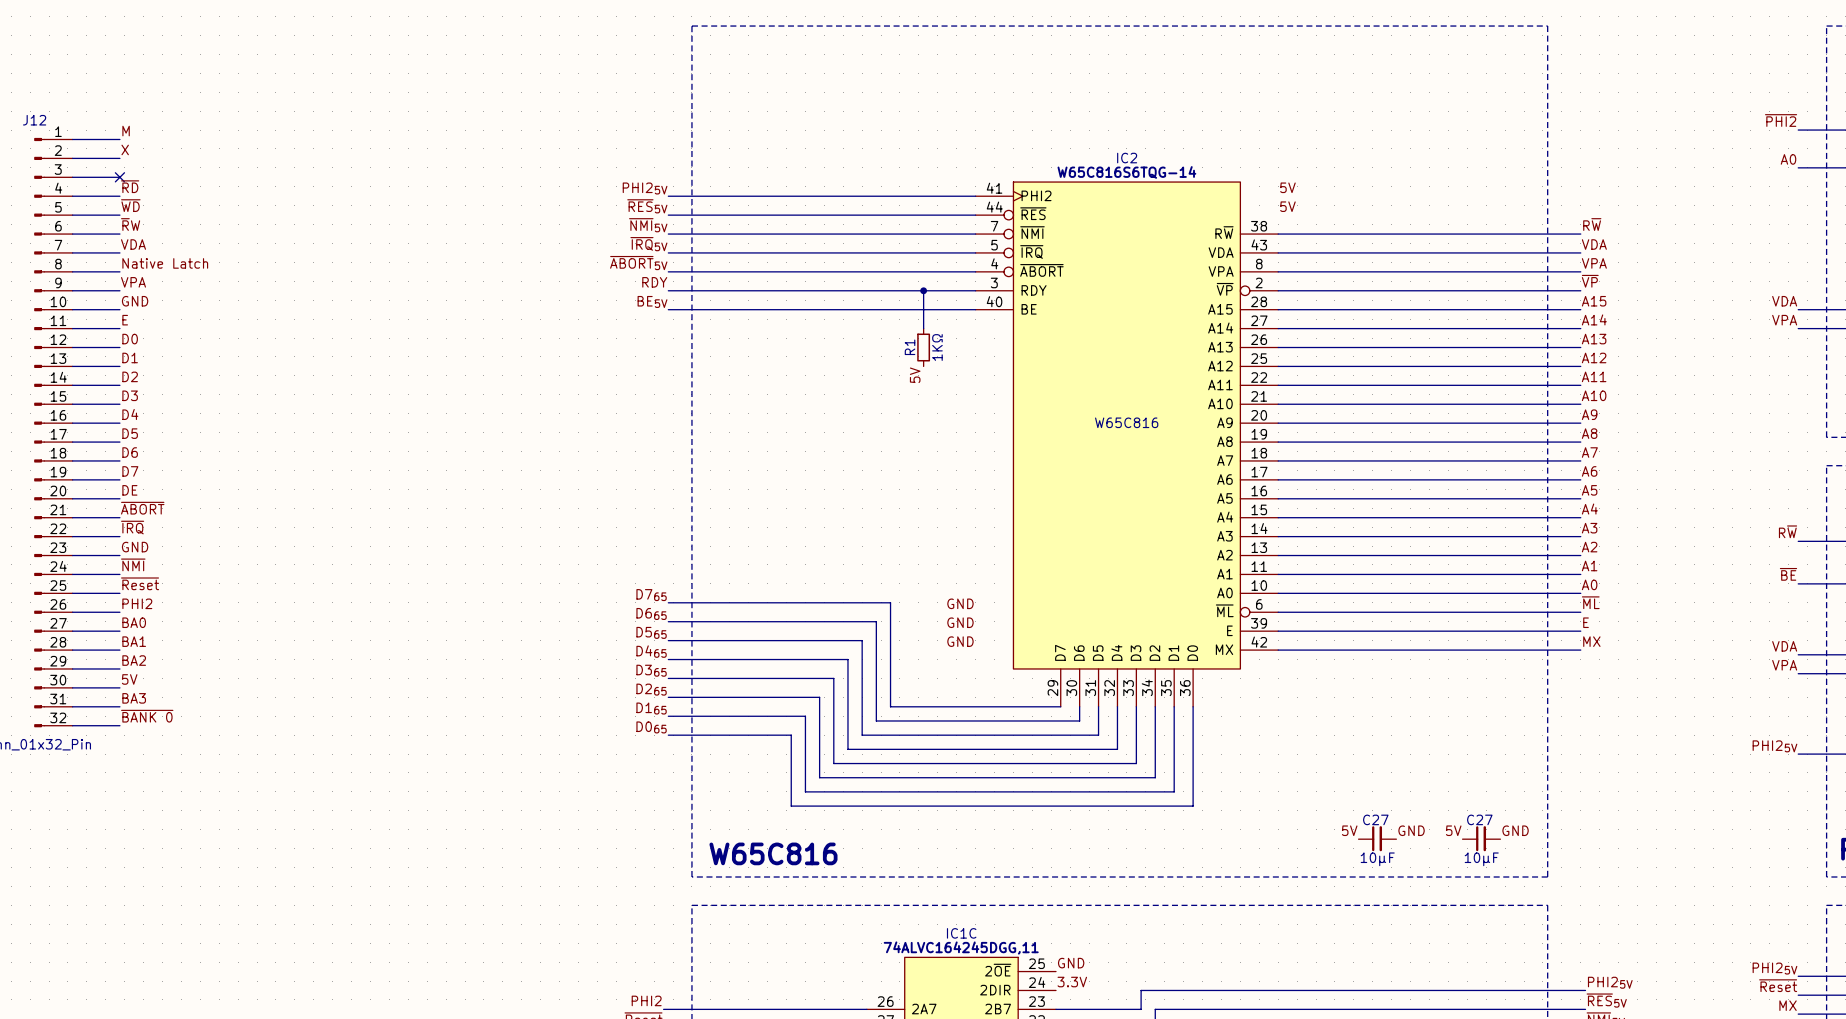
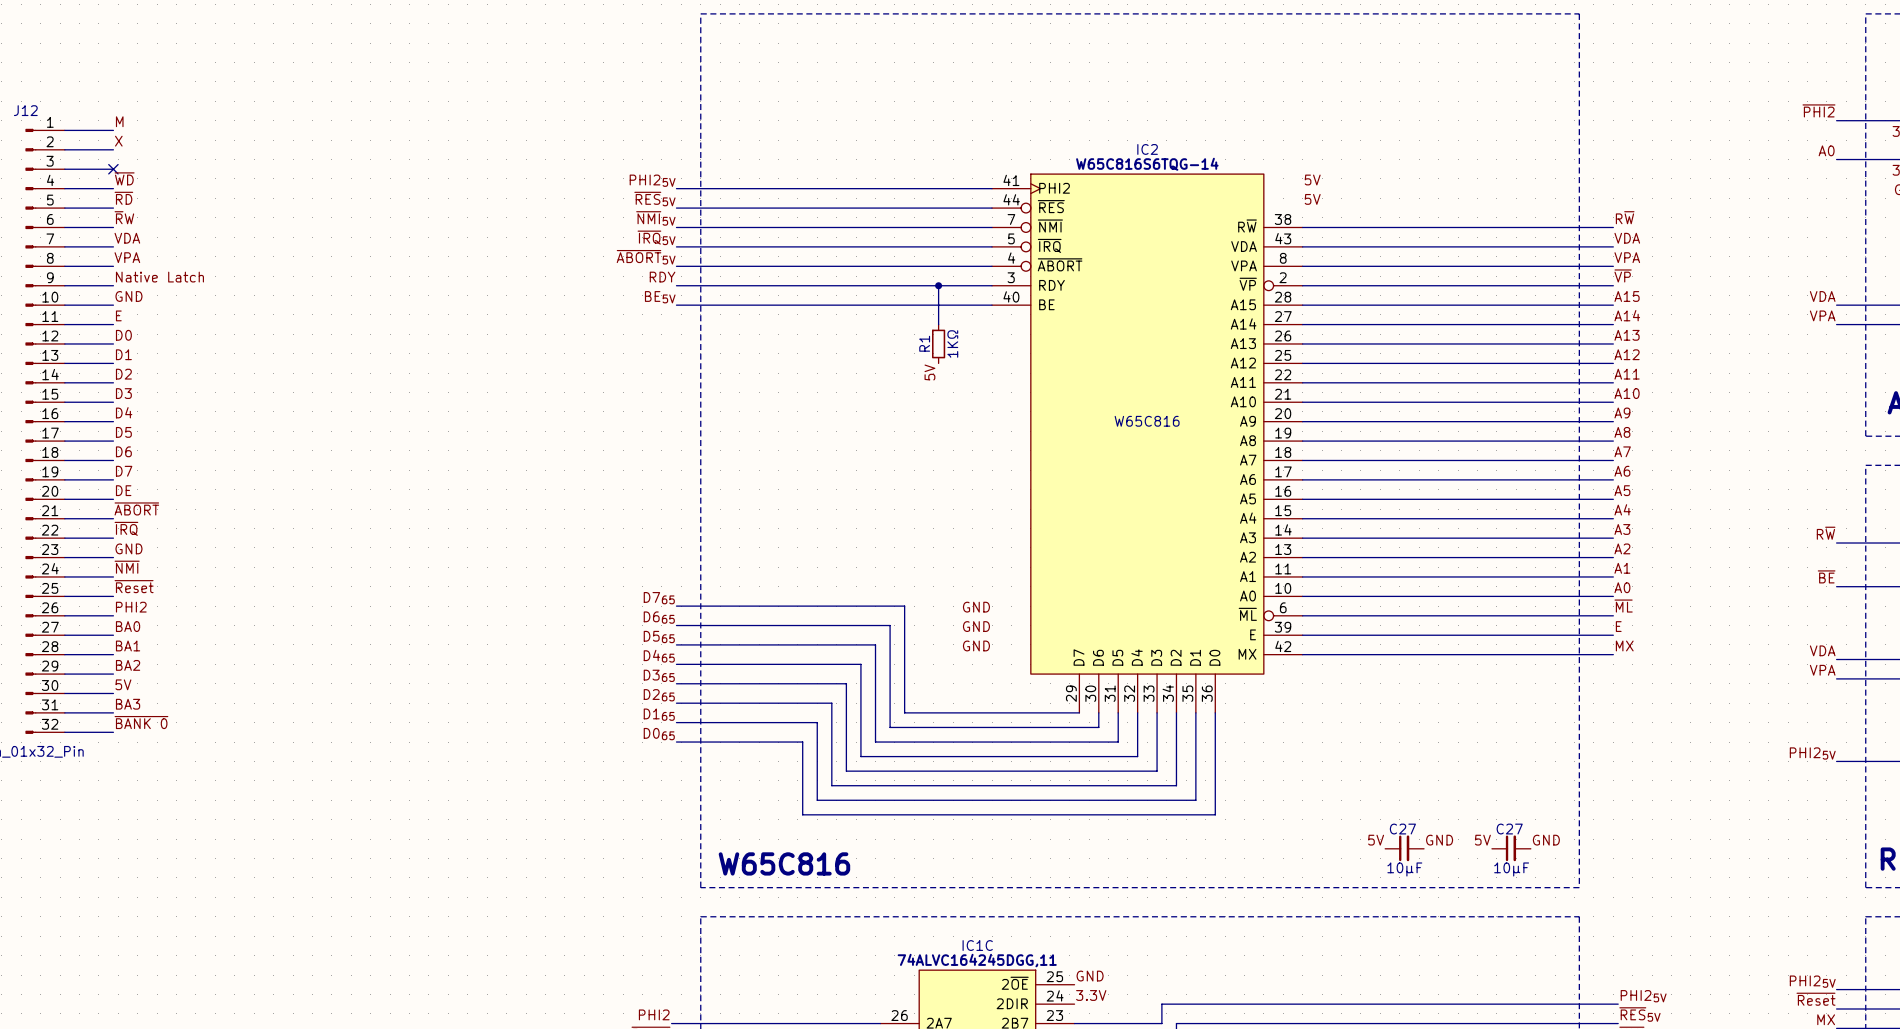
label: ~{RD} (130, 186) -> ~{WD} (124, 178)
label: ~{WD} (130, 205) -> ~{RD} (123, 198)
label: Native Latch (165, 263) -> VPA (127, 257)
label: VPA (133, 282) -> Native Latch (159, 277)

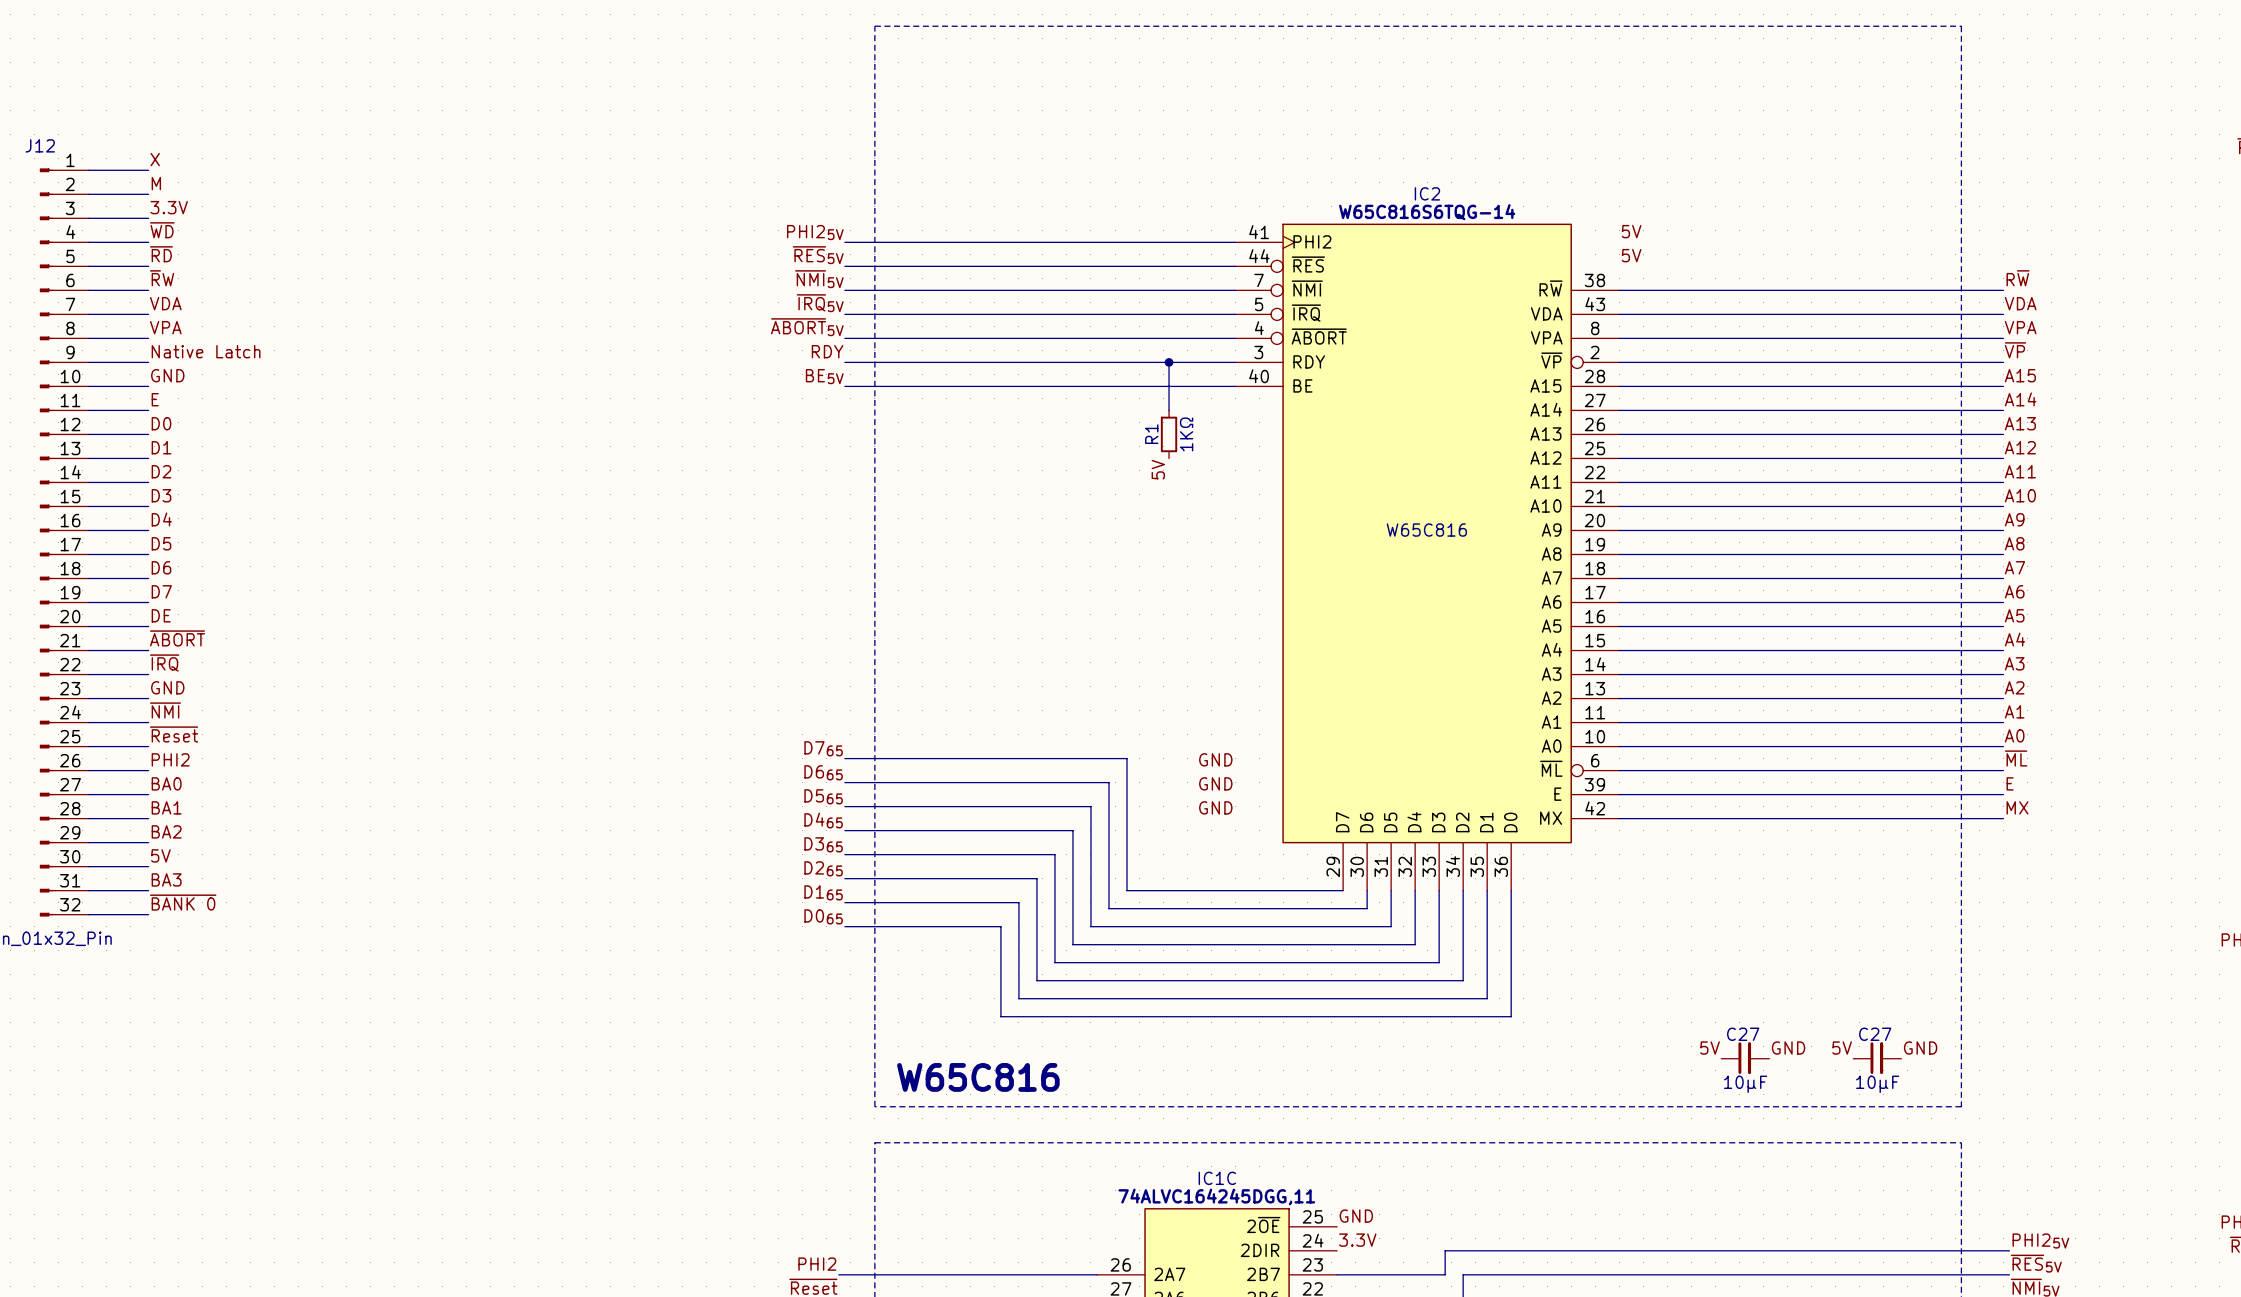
label: M (119, 121) -> X (155, 159)
label: X (118, 141) -> M (156, 183)
label: none -> 3.3V (169, 207)
no-connect mark: (113, 169) -> none

